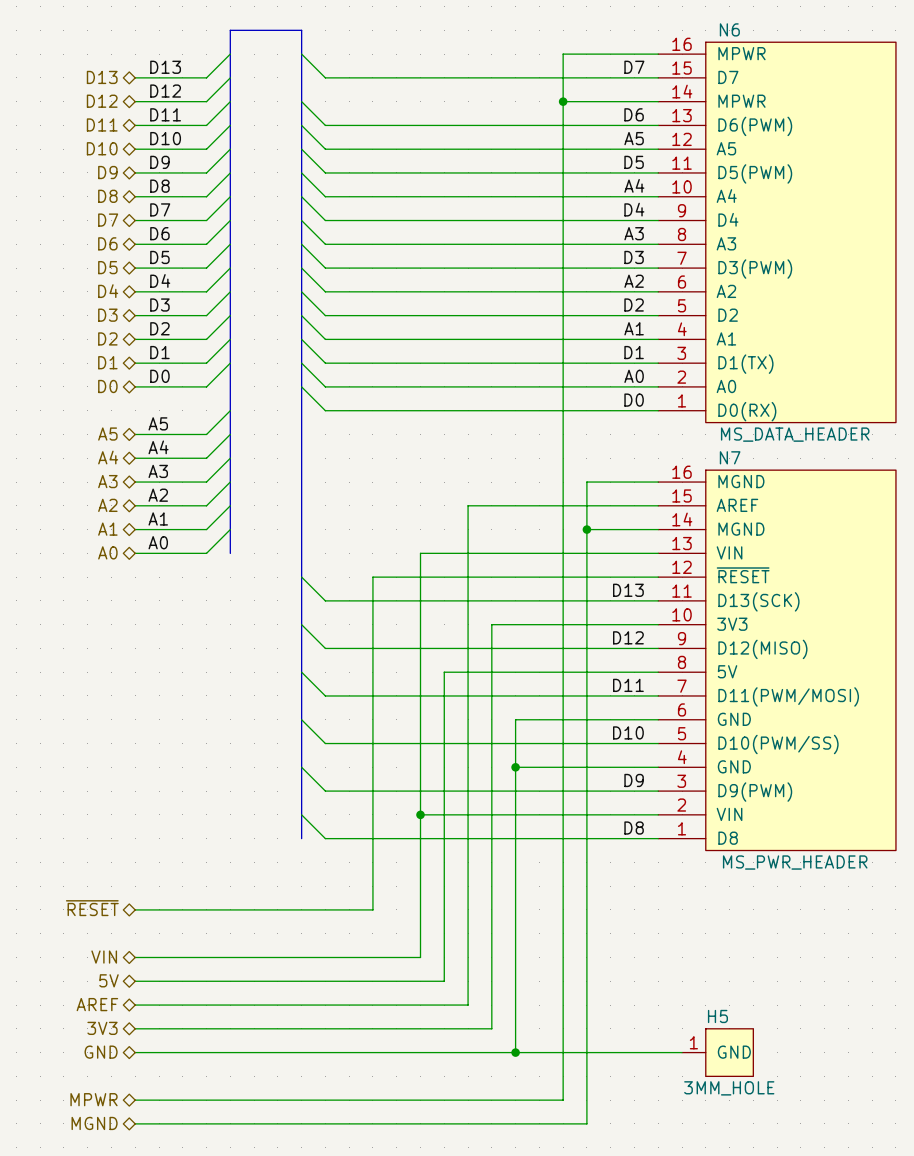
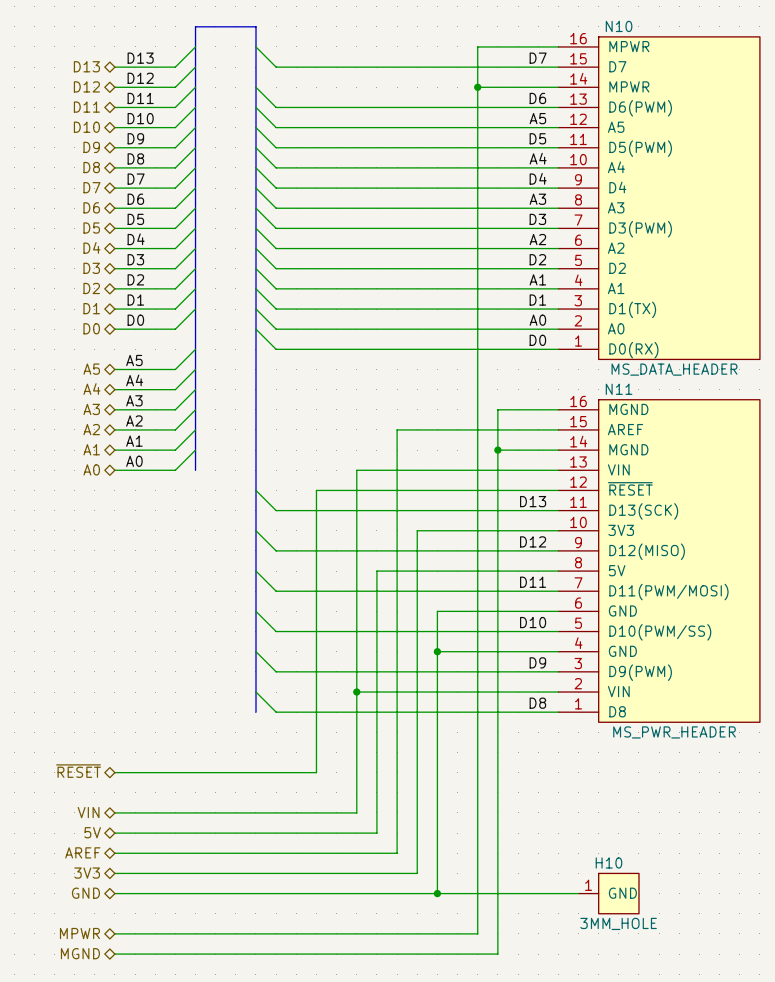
N6 name: N6 (729, 29) -> N10 (619, 26)
N7 name: N7 (730, 457) -> N11 (619, 389)
H5 name: H5 (717, 1016) -> H10 (608, 862)

